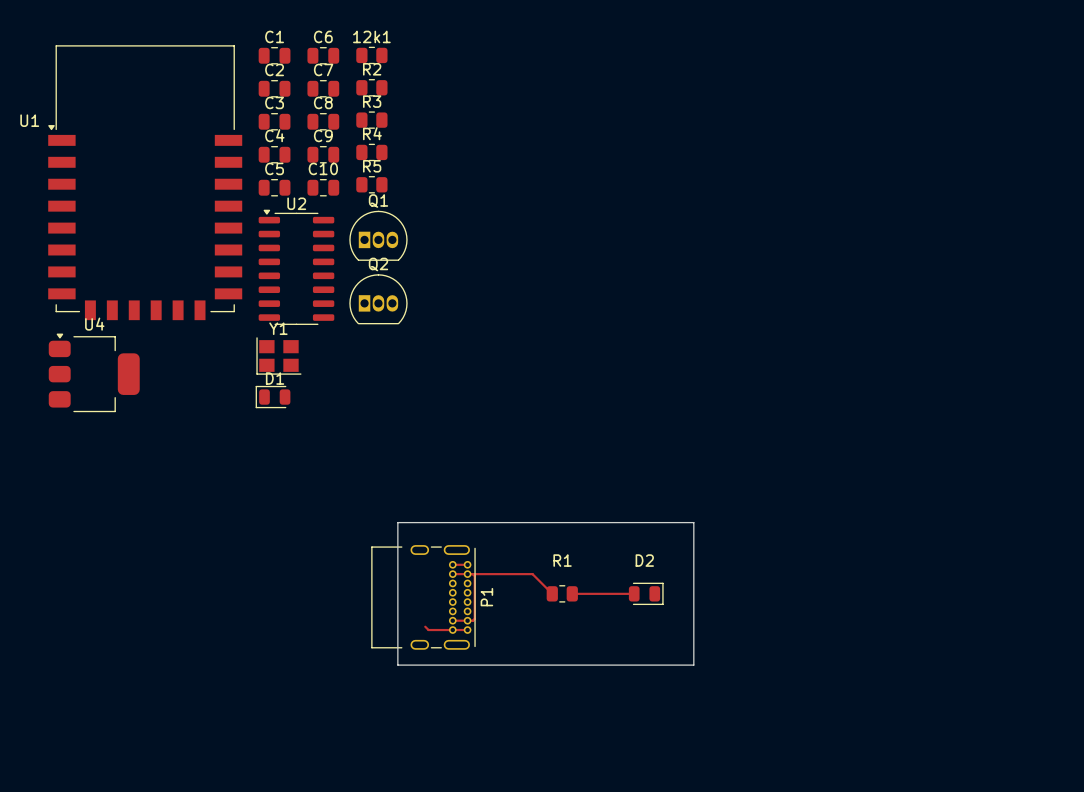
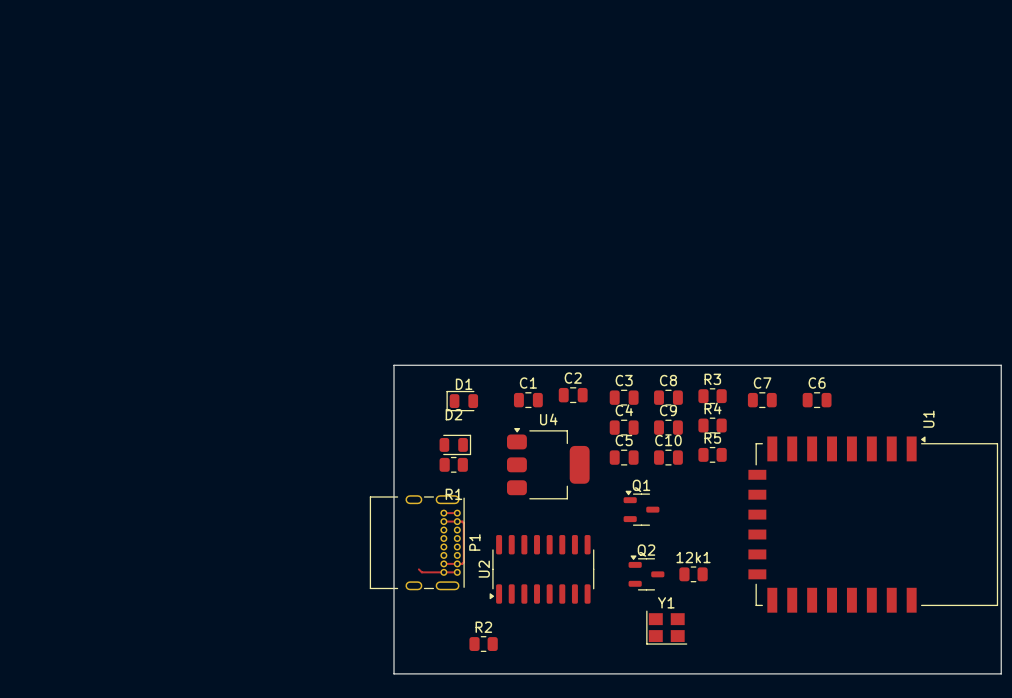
C1 position: (274, 55) -> (528, 400)
C6 position: (323, 55) -> (817, 400)
12k1 position: (371, 55) -> (693, 574)
R2 position: (371, 87) -> (483, 644)
C2 position: (274, 88) -> (573, 395)
C7 position: (323, 88) -> (762, 400)
R3 position: (371, 120) -> (712, 396)
C3 position: (274, 121) -> (624, 397)
C8 position: (323, 121) -> (668, 397)
R4 position: (371, 152) -> (712, 425)
C4 position: (274, 154) -> (624, 427)
C9 position: (323, 154) -> (668, 427)
U1 rotation: 0° (145, 182) -> 90° clockwise (873, 524)
U1 position: (145, 182) -> (873, 524)
R5 position: (371, 184) -> (712, 454)
C5 position: (274, 187) -> (624, 457)
C10 position: (323, 187) -> (668, 457)
Q1 footprint: [349, 210, 408, 261] -> [623, 490, 660, 526]
U2 rotation: 0° (296, 267) -> 90° counterclockwise (541, 569)
U2 position: (296, 267) -> (541, 569)
Q2 footprint: [349, 274, 408, 325] -> [628, 555, 665, 591]
Y1 position: (278, 355) -> (666, 627)
U4 position: (94, 372) -> (548, 463)
D1 position: (273, 397) -> (462, 401)
board edge: (397, 522) (693, 522) (693, 665) (397, 665) -> (394, 474) (394, 365) (1001, 365) (1001, 673) (394, 673) (394, 604)
R1 name position: R1 (562, 560) -> R1 (453, 494)
track: (473, 574) (532, 574) (552, 593) -> none
R1 position: (562, 593) -> (453, 464)
track: (572, 593) (634, 593) -> none
D2 position: (646, 593) -> (455, 444)

